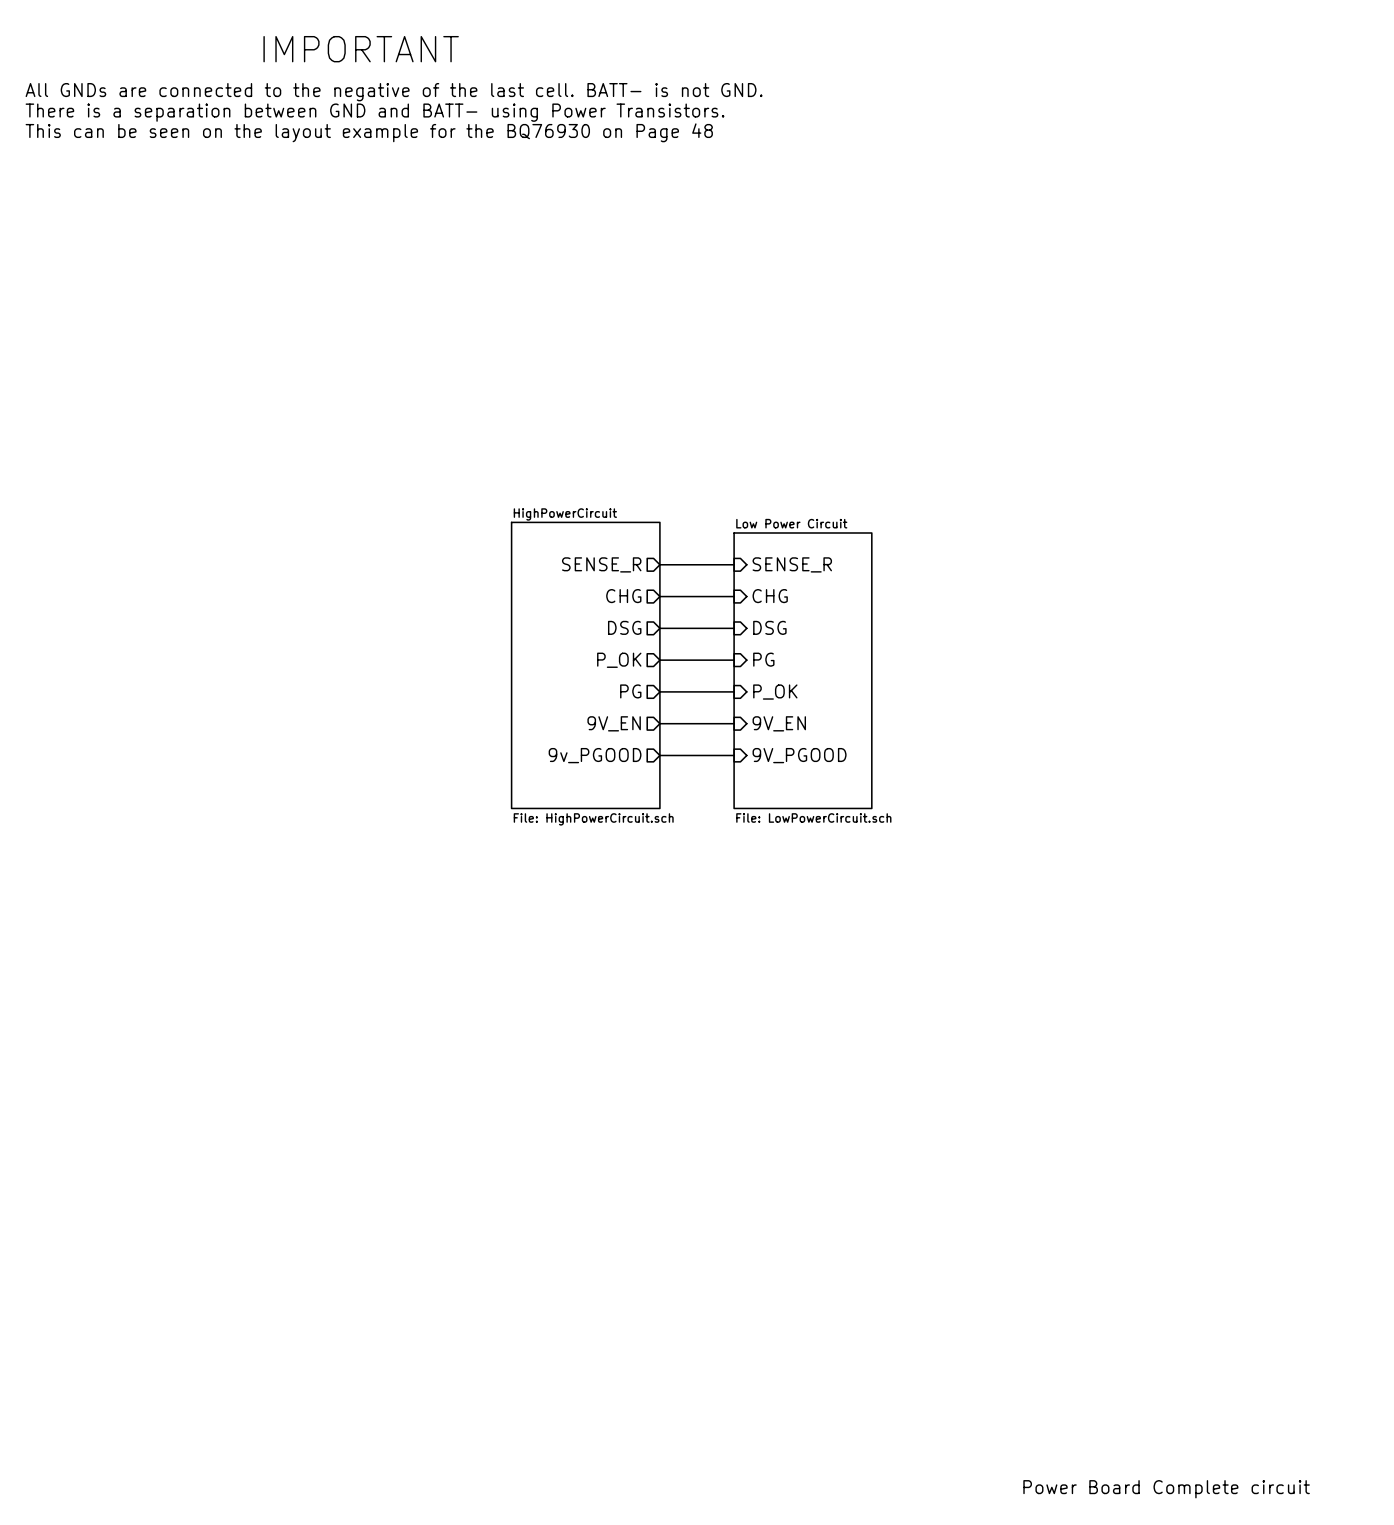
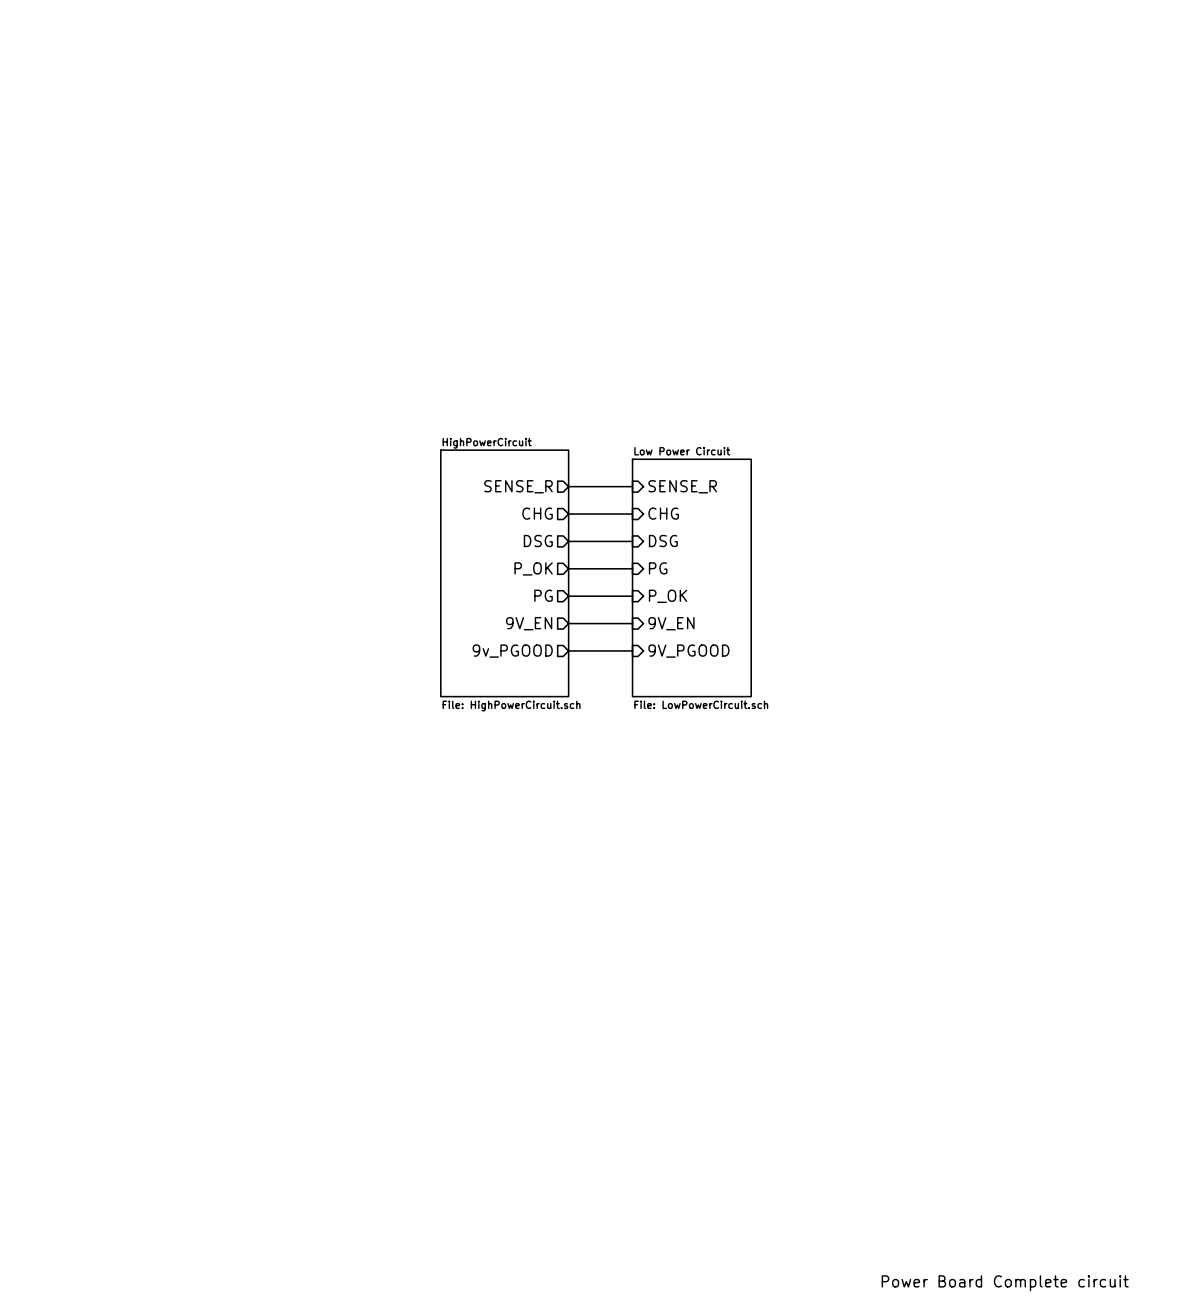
text: IMPORTANT (361, 49) -> none
text: All GNDs are connected to the negative of the last cell. BATT- is not GND. (394, 92) -> none
text: There is a separation between GND and BATT- using Power Transistors. (375, 112) -> none
text: This can be seen on the layout example for the BQ76930 on Page 48 (369, 132) -> none

